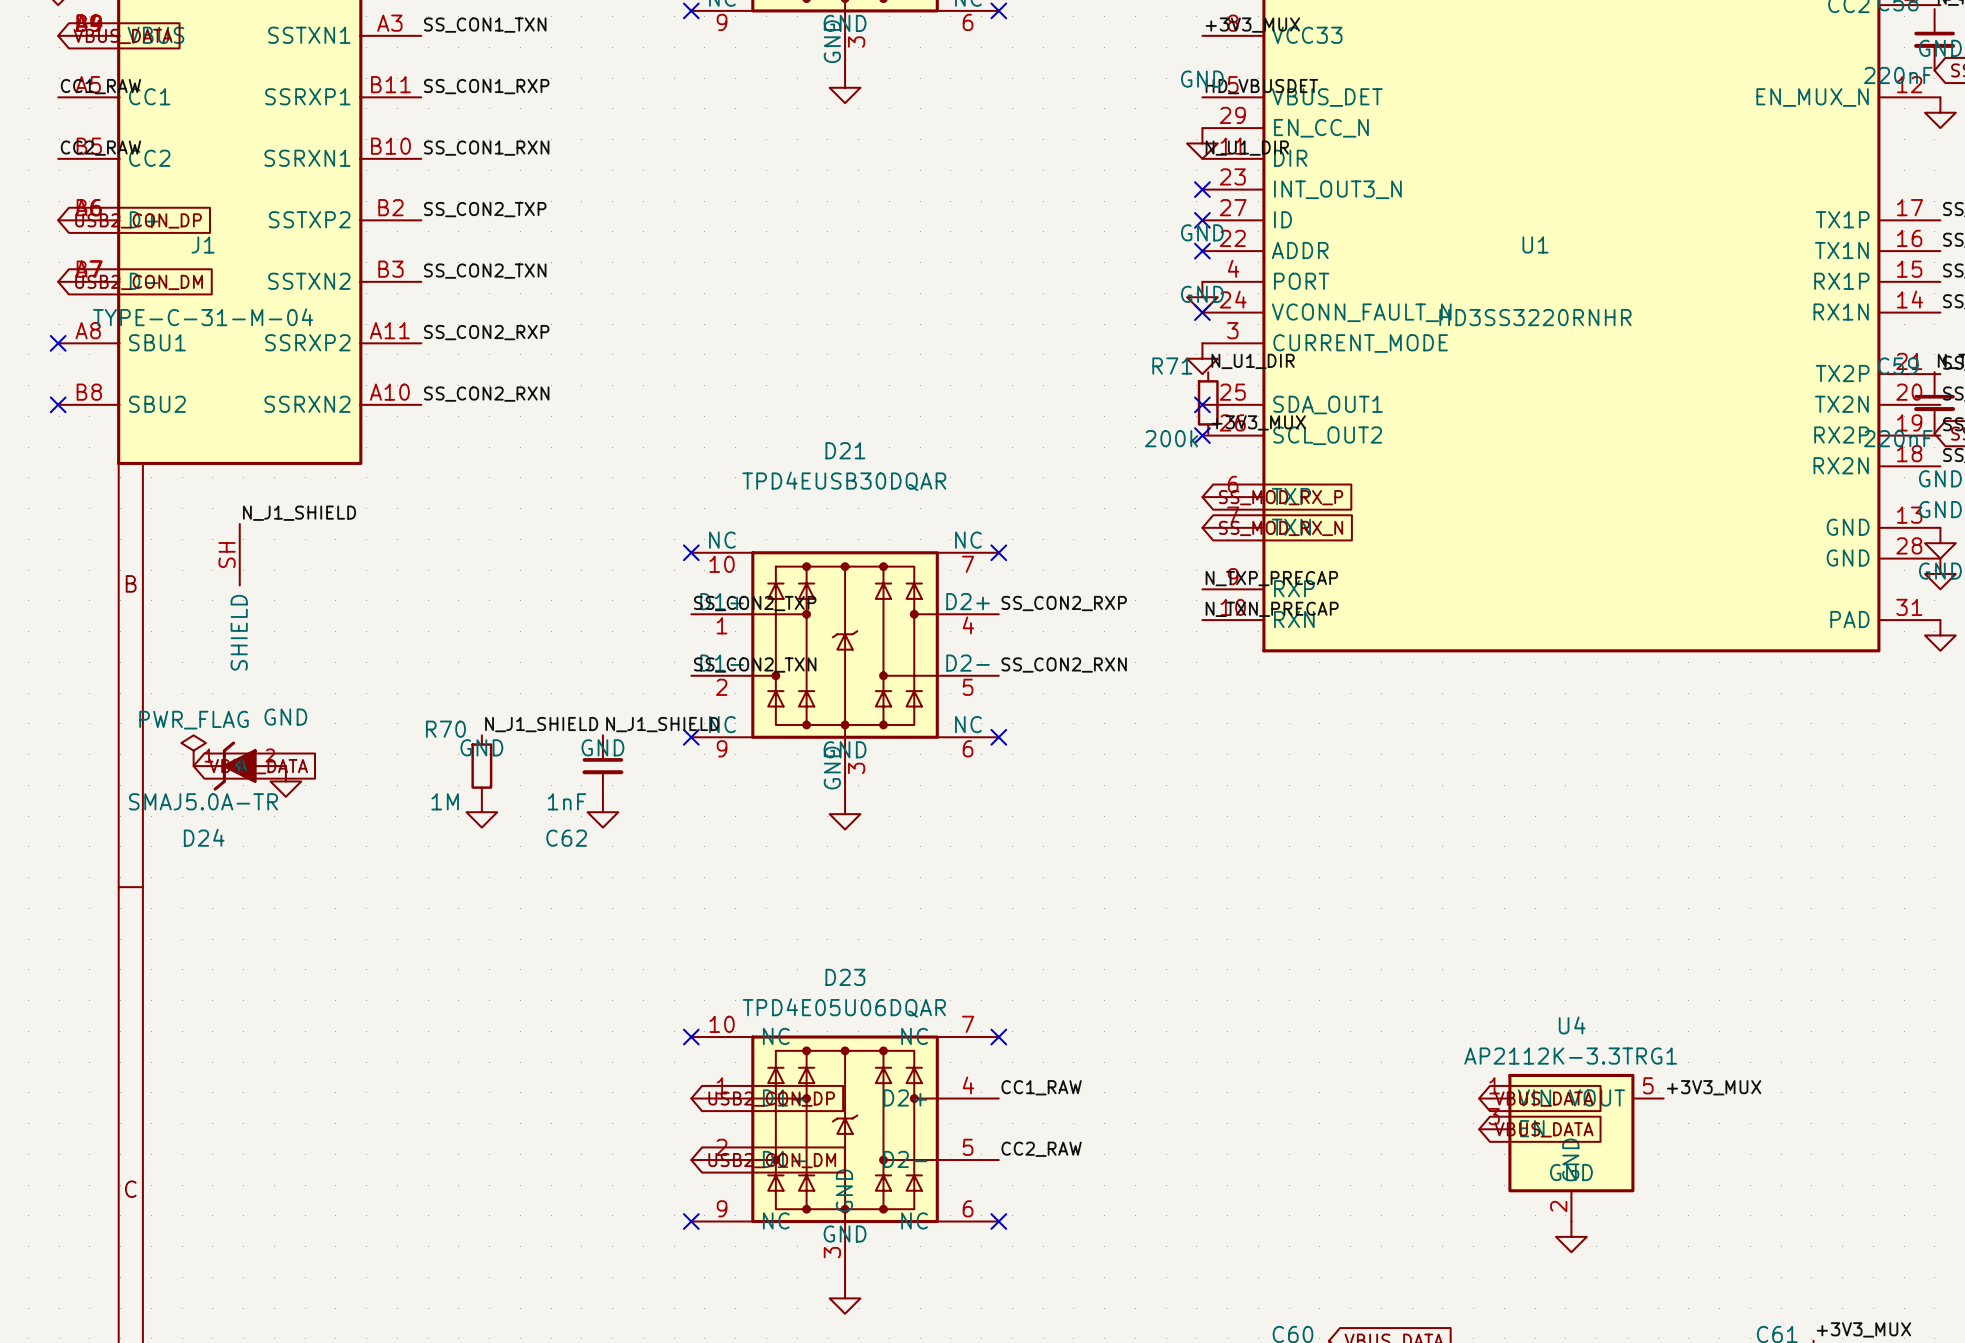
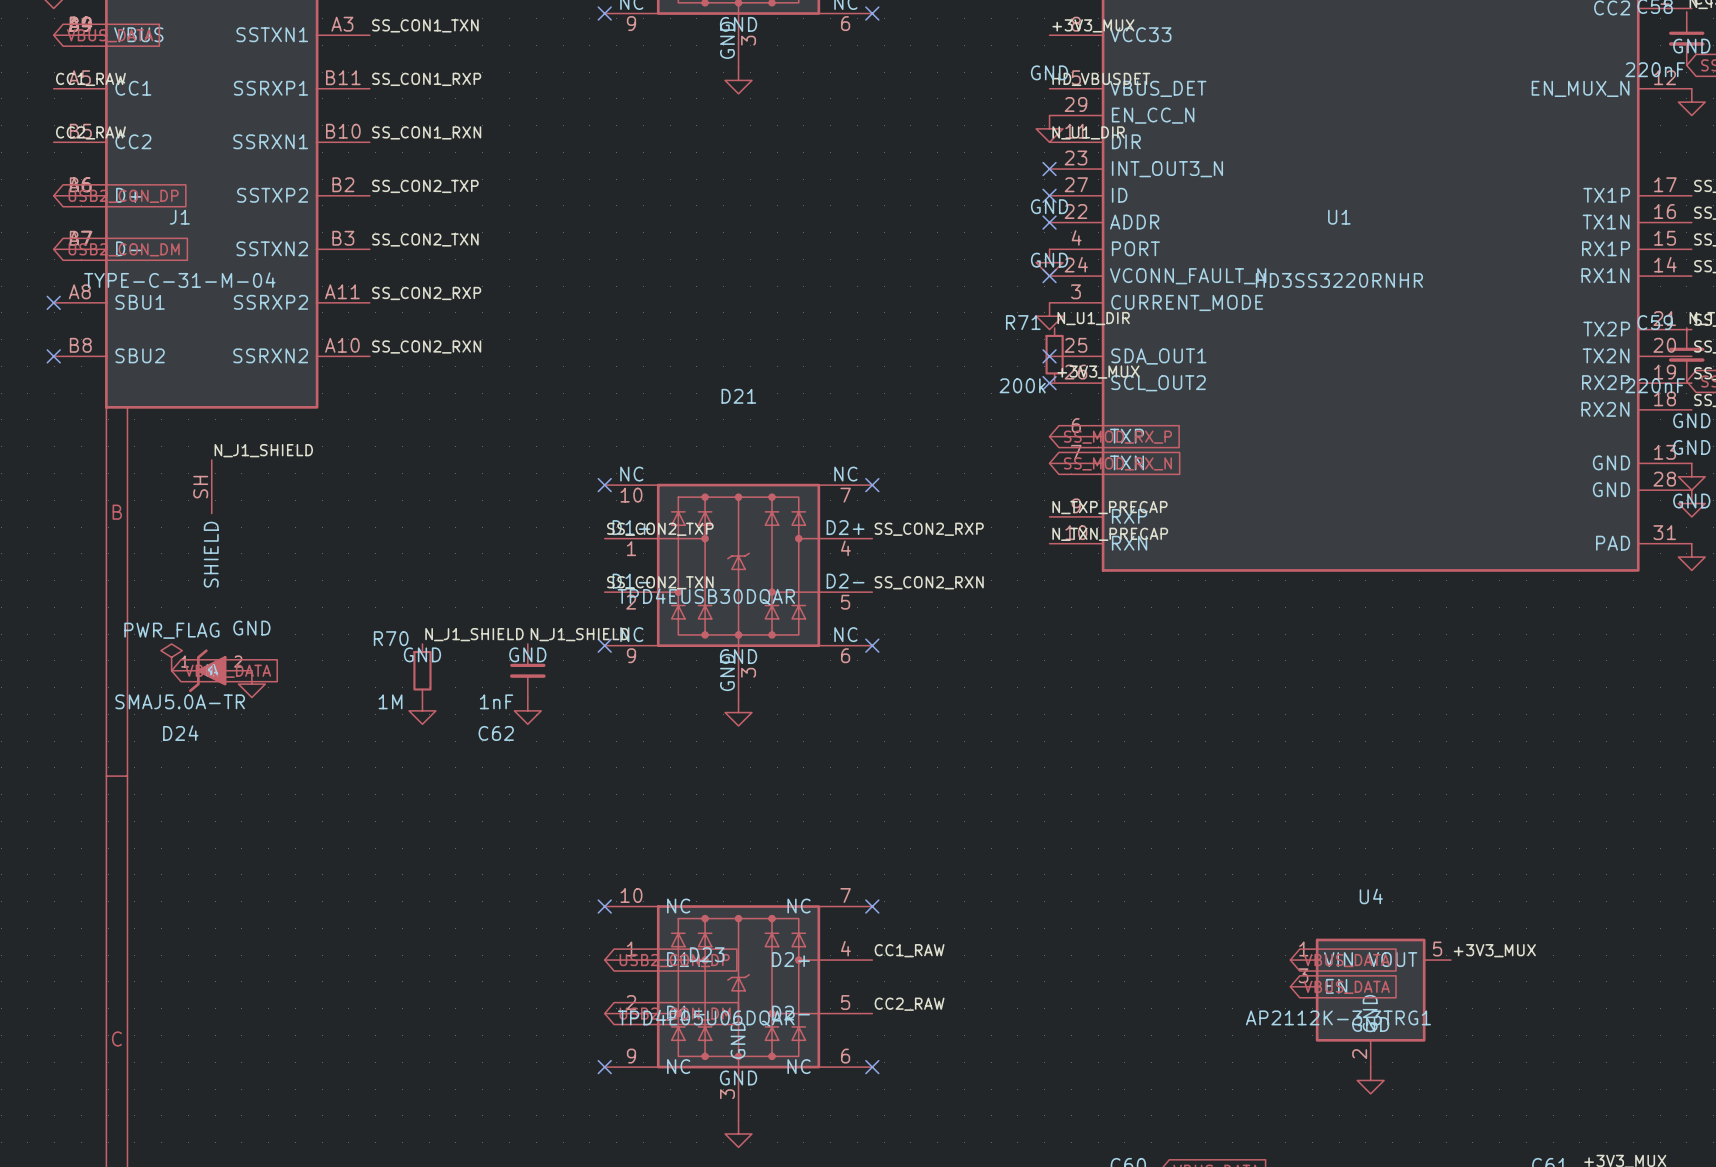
D21 value position: TPD4EUSB30DQAR (844, 481) -> TPD4EUSB30DQAR (706, 596)
D23 name position: D23 (845, 977) -> D23 (707, 954)
D23 value position: TPD4E05U06DQAR (844, 1007) -> TPD4E05U06DQAR (706, 1018)
U4 value position: AP2112K-3.3TRG1 (1570, 1056) -> AP2112K-3.3TRG1 (1338, 1017)

